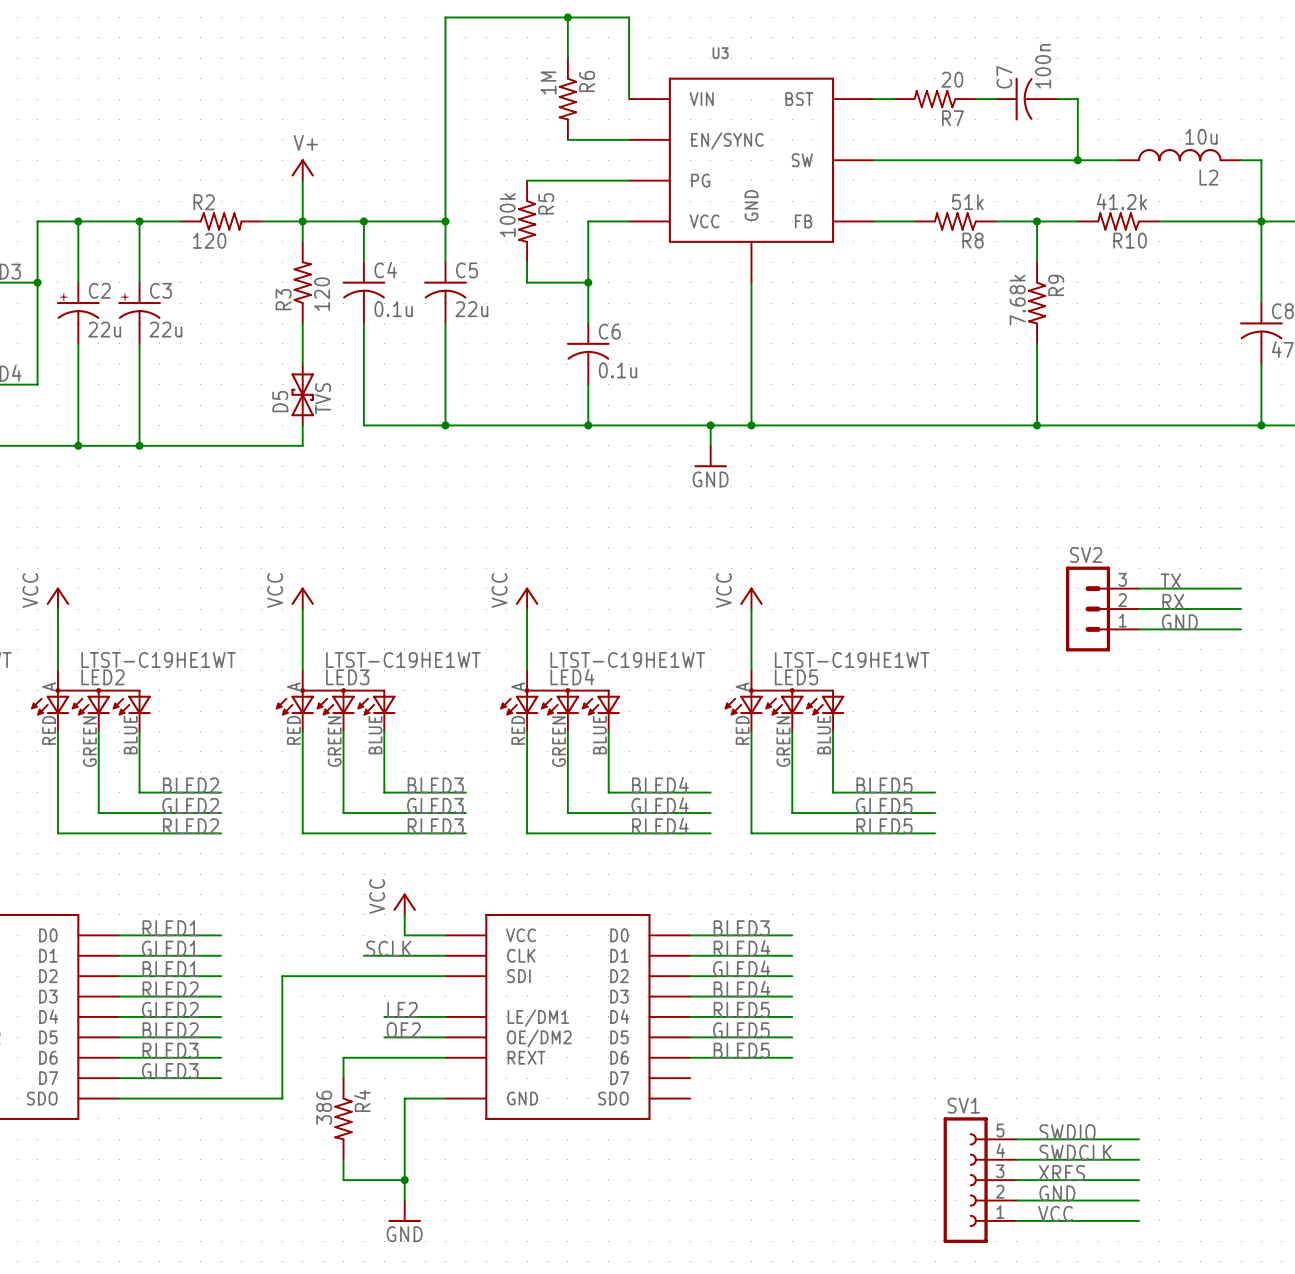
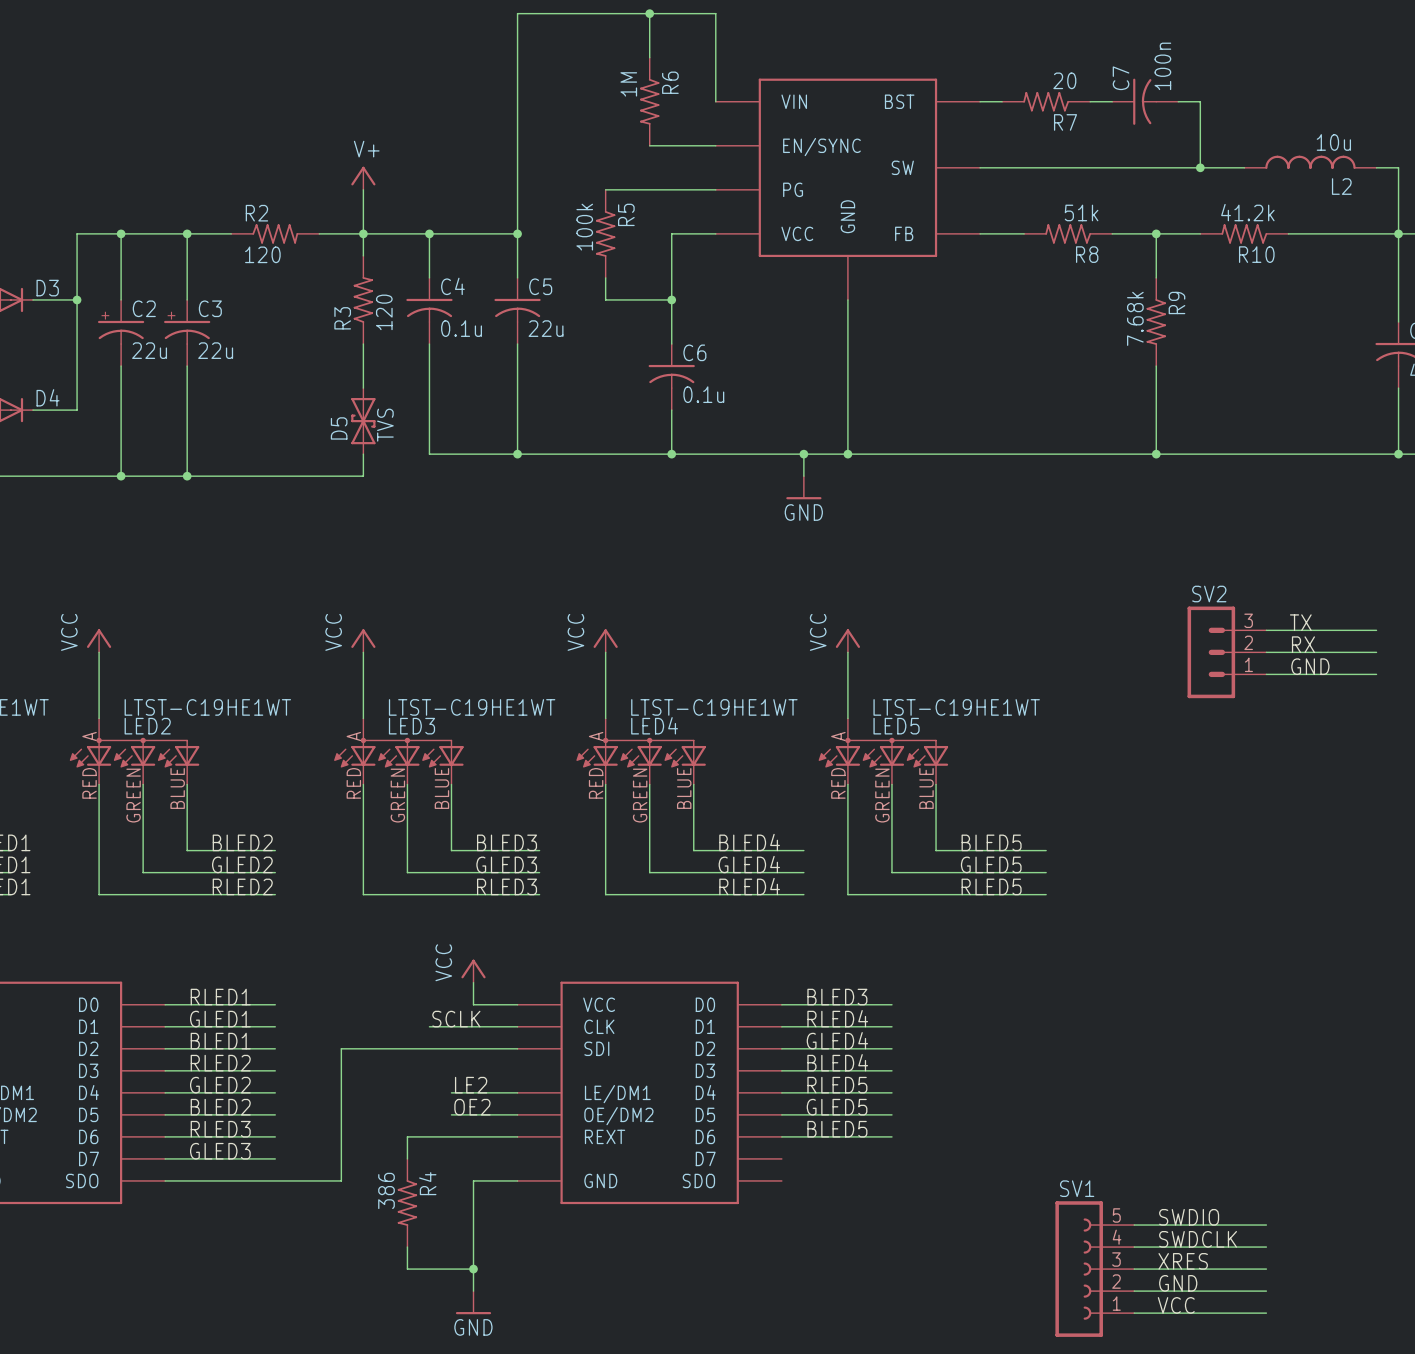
U3 name: U3 (720, 53) -> none

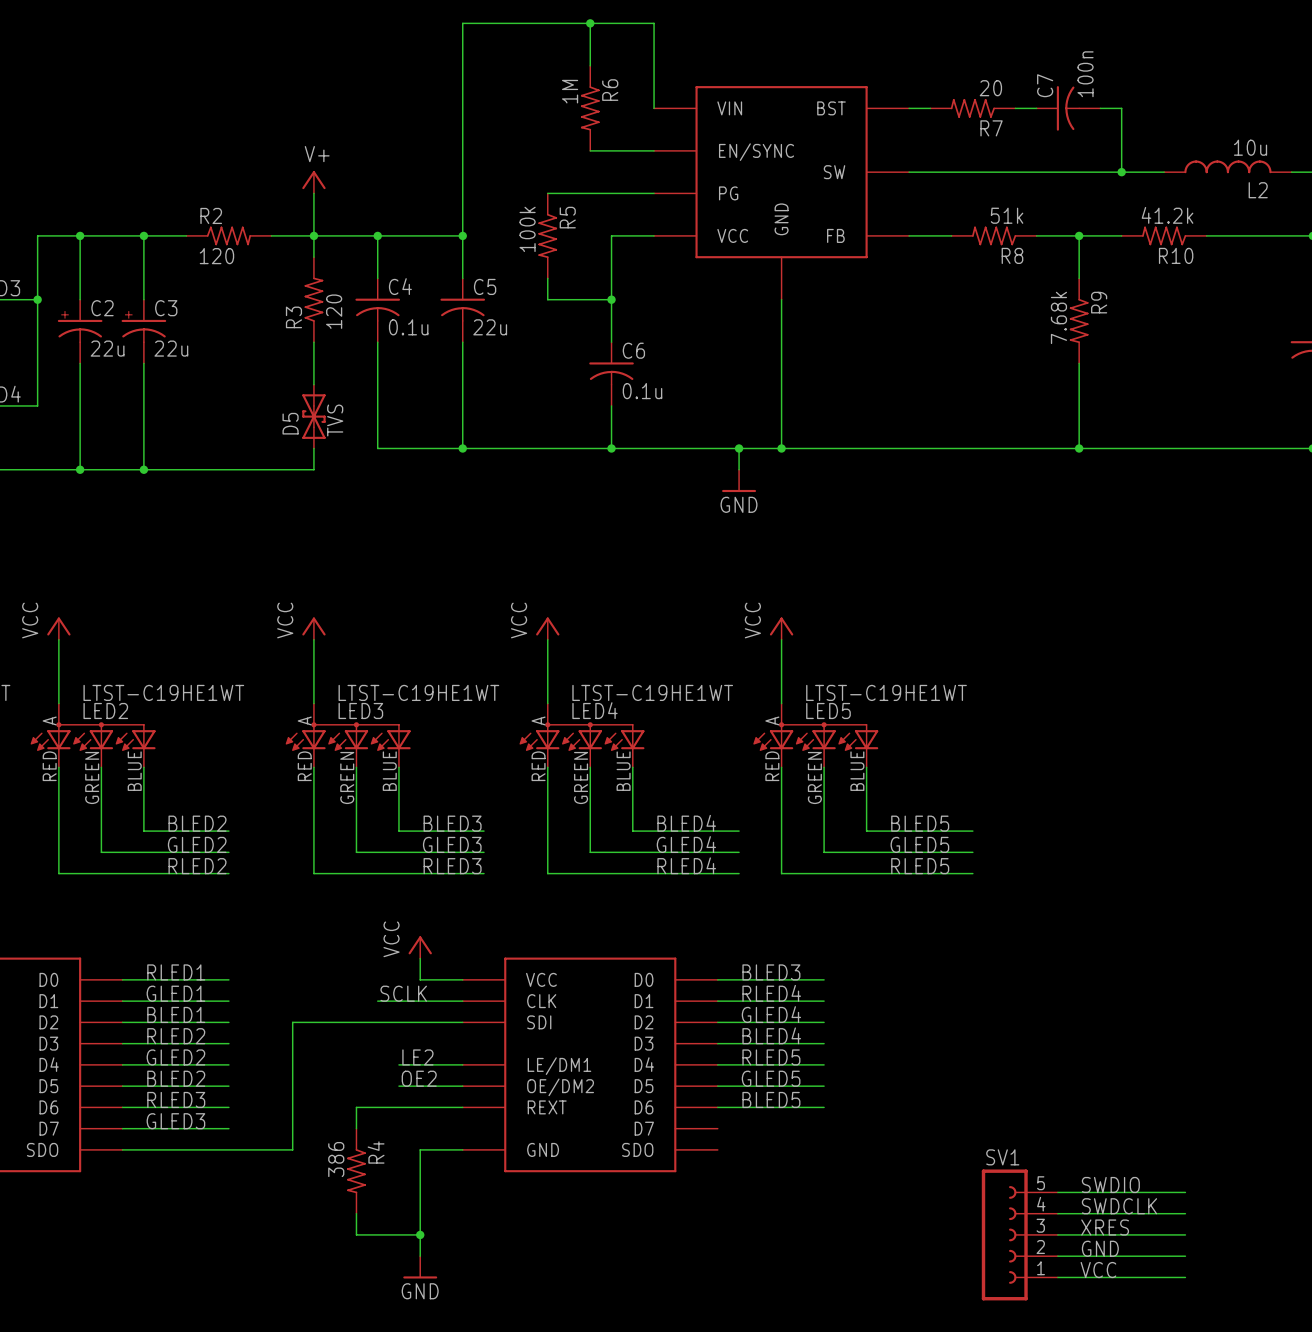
label: TX (1300, 622) -> none
wire: (1266, 630) (1376, 630) -> none
label: RX (1303, 644) -> none
SV2: (1226, 652) -> none
wire: (1266, 652) (1376, 652) -> none
label: GND (1310, 666) -> none
wire: (1266, 674) (1376, 674) -> none

